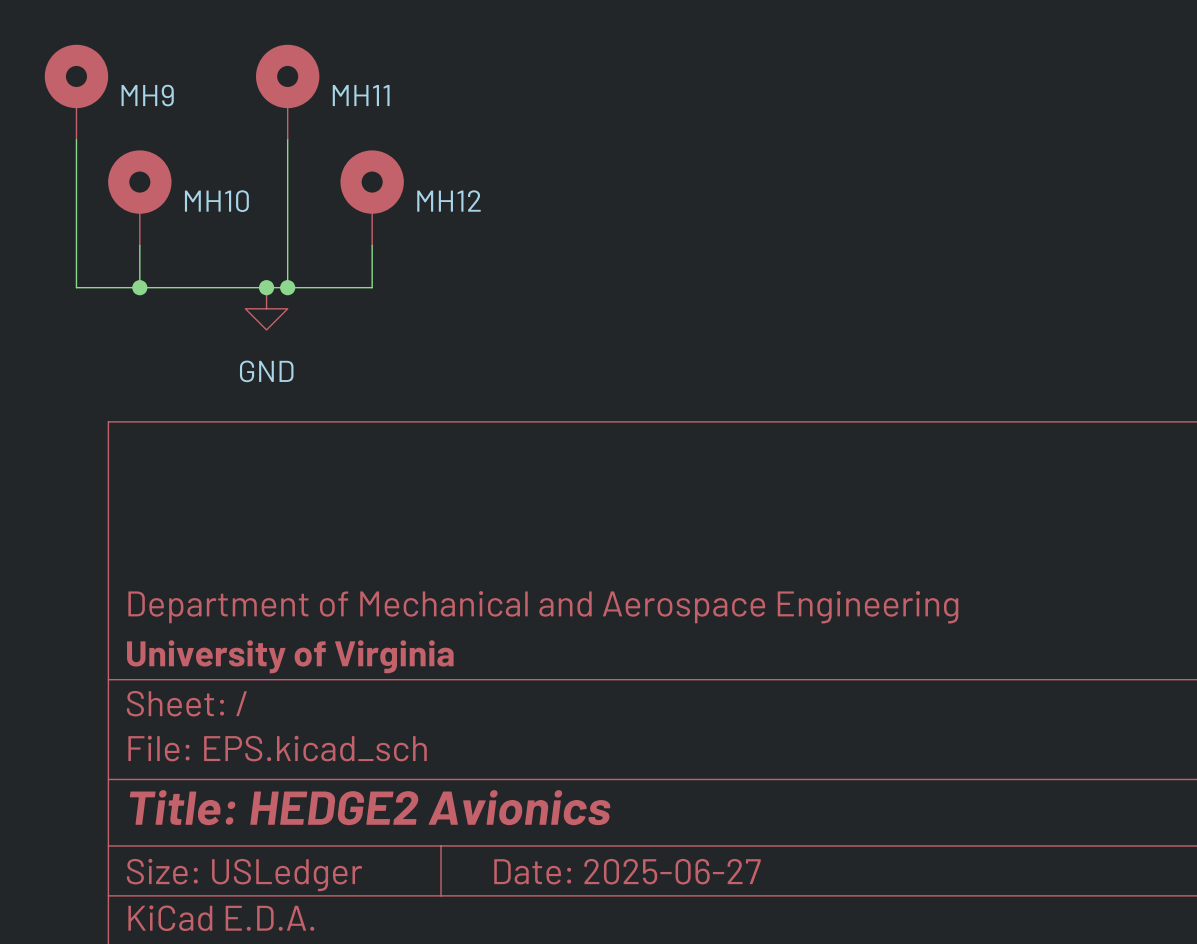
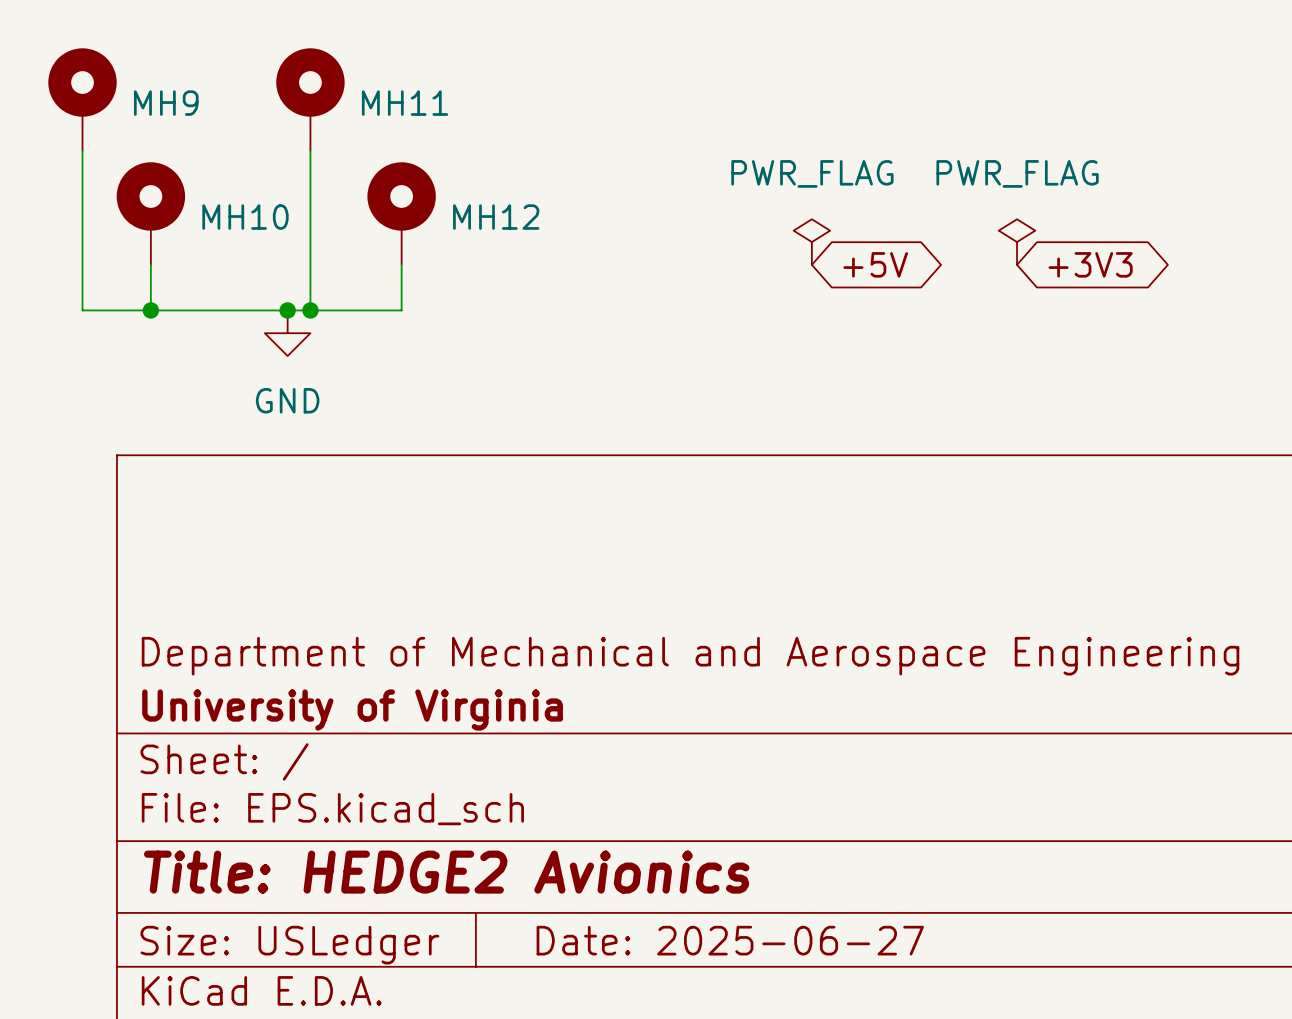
power symbol: none -> PWR_FLAG (811, 242)
power symbol: none -> PWR_FLAG (1017, 242)
global label: none -> +5V (875, 264)
global label: none -> +3V3 (1090, 264)

